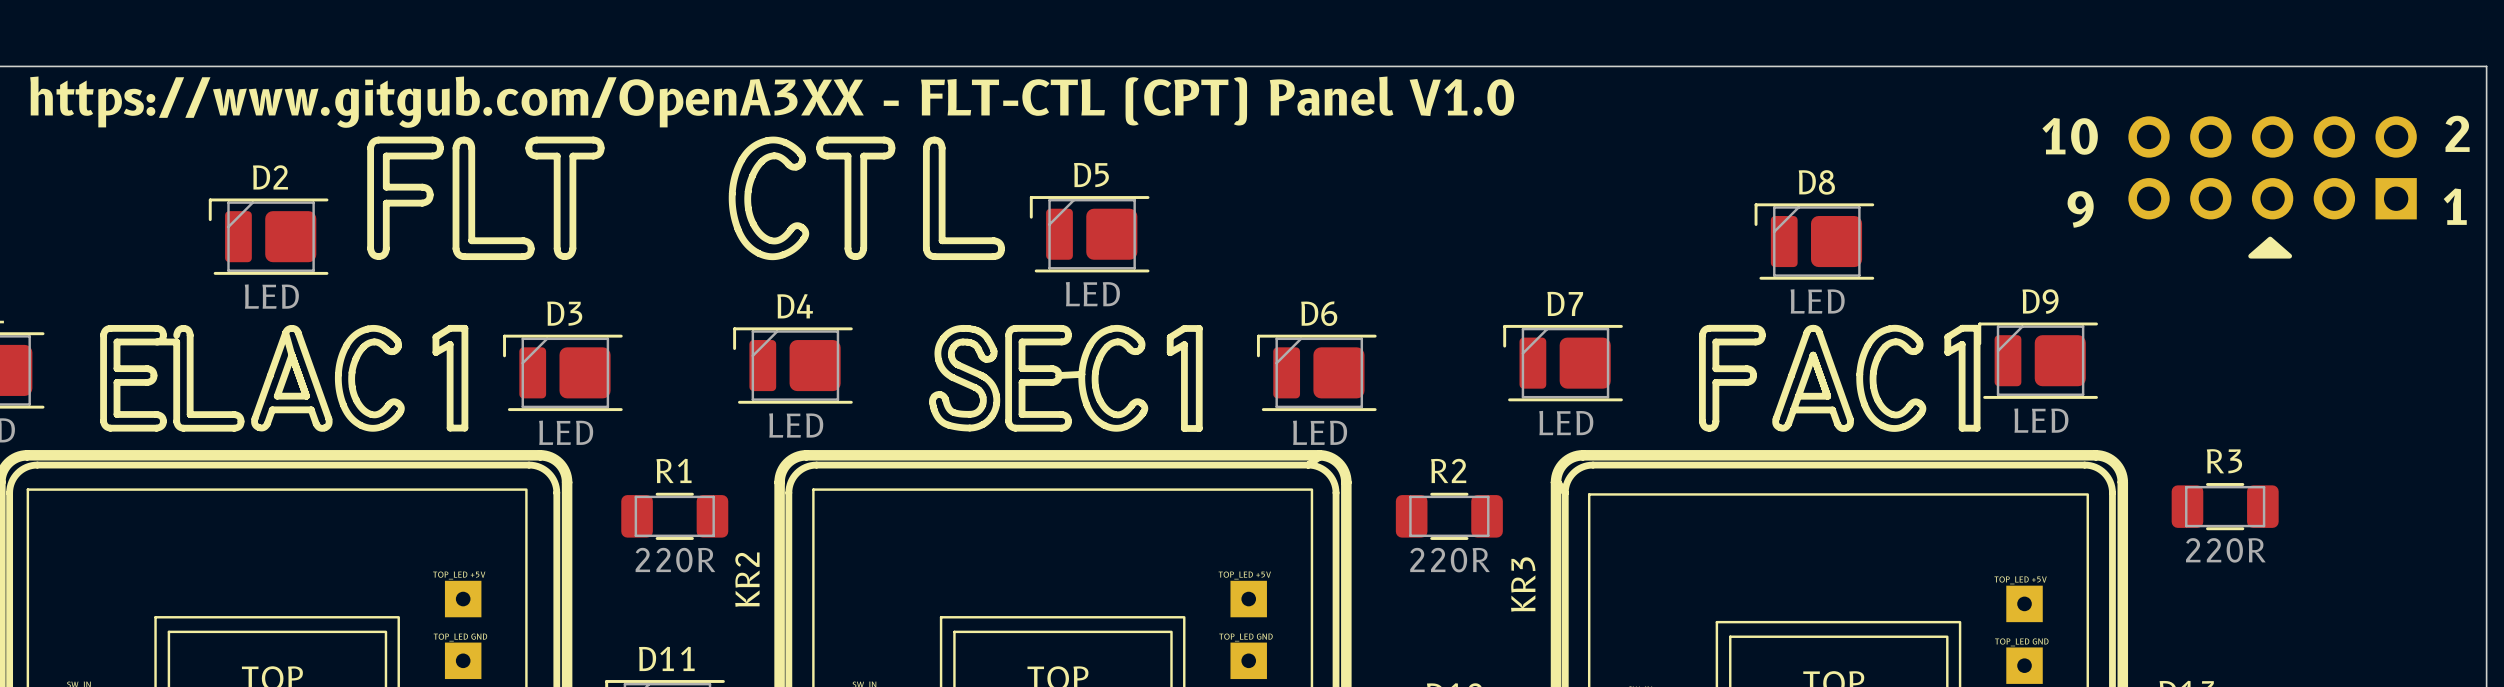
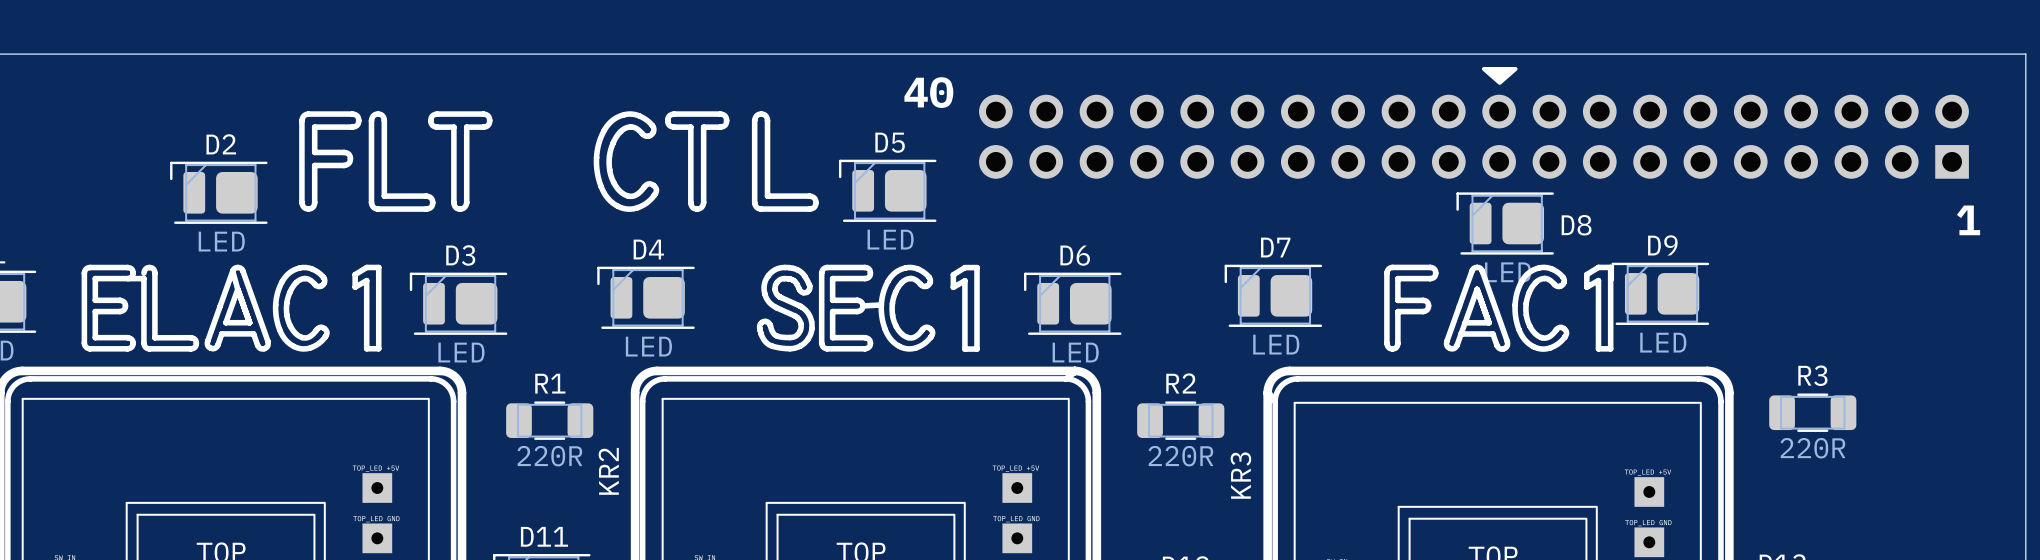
drawing: none -> [1481, 66, 1518, 85]
text: https://www.gitgub.com/OpenA3XX - FLT-CTL (CPT) Panel V1.0 (772, 102) -> none
text: none -> 40 (928, 92)
text: 2 (2457, 133) -> none
text: 10 (2070, 136) -> none
part: none -> (1473, 136)
D8 name position: D8 (1816, 182) -> D8 (1576, 225)
text position: 1 (2455, 206) -> 1 (1968, 220)
text: 9 (2080, 209) -> none
drawing: [2248, 236, 2293, 259] -> none
D8 position: (1814, 241) -> (1505, 223)

